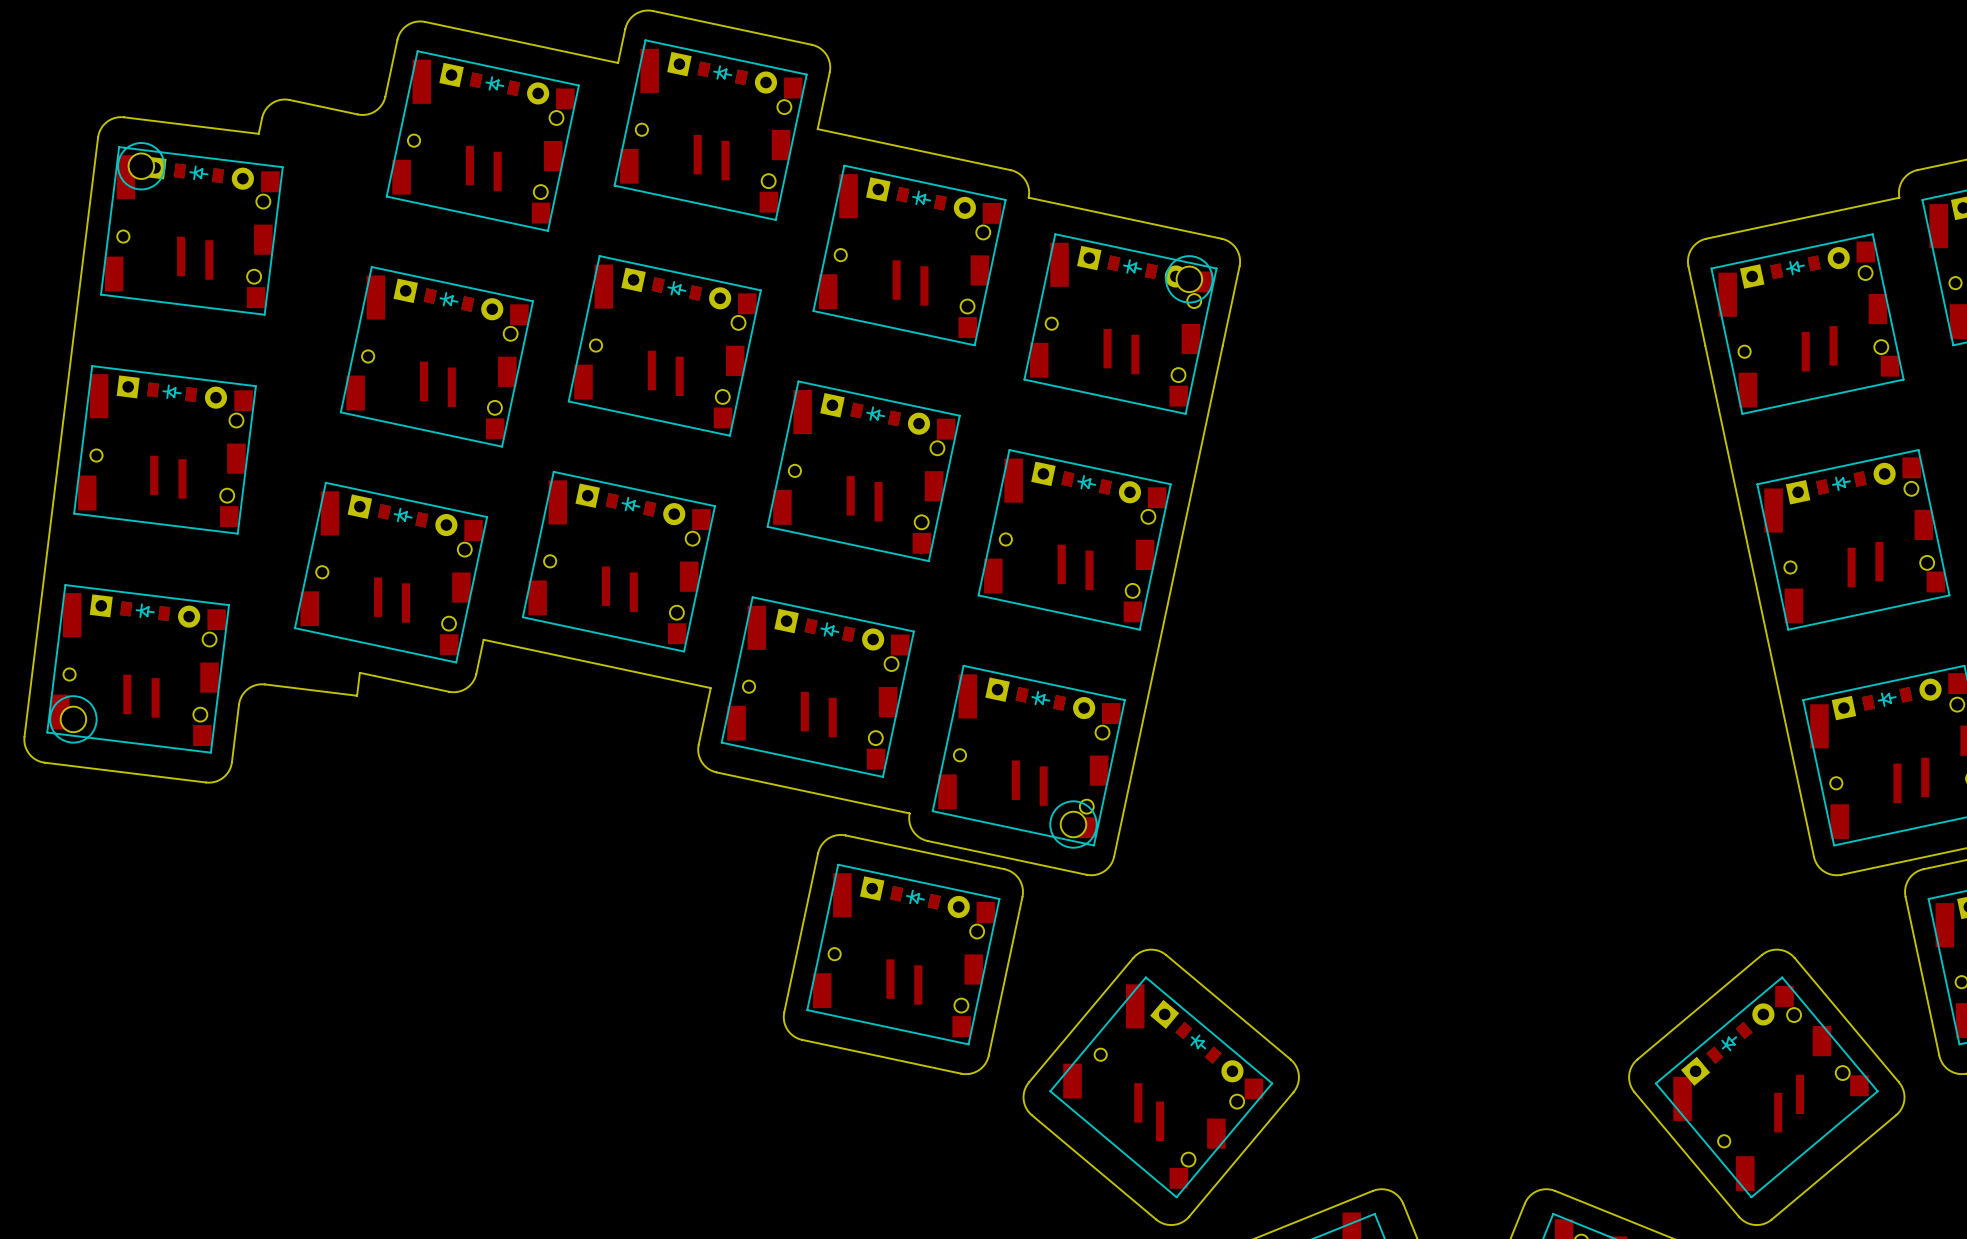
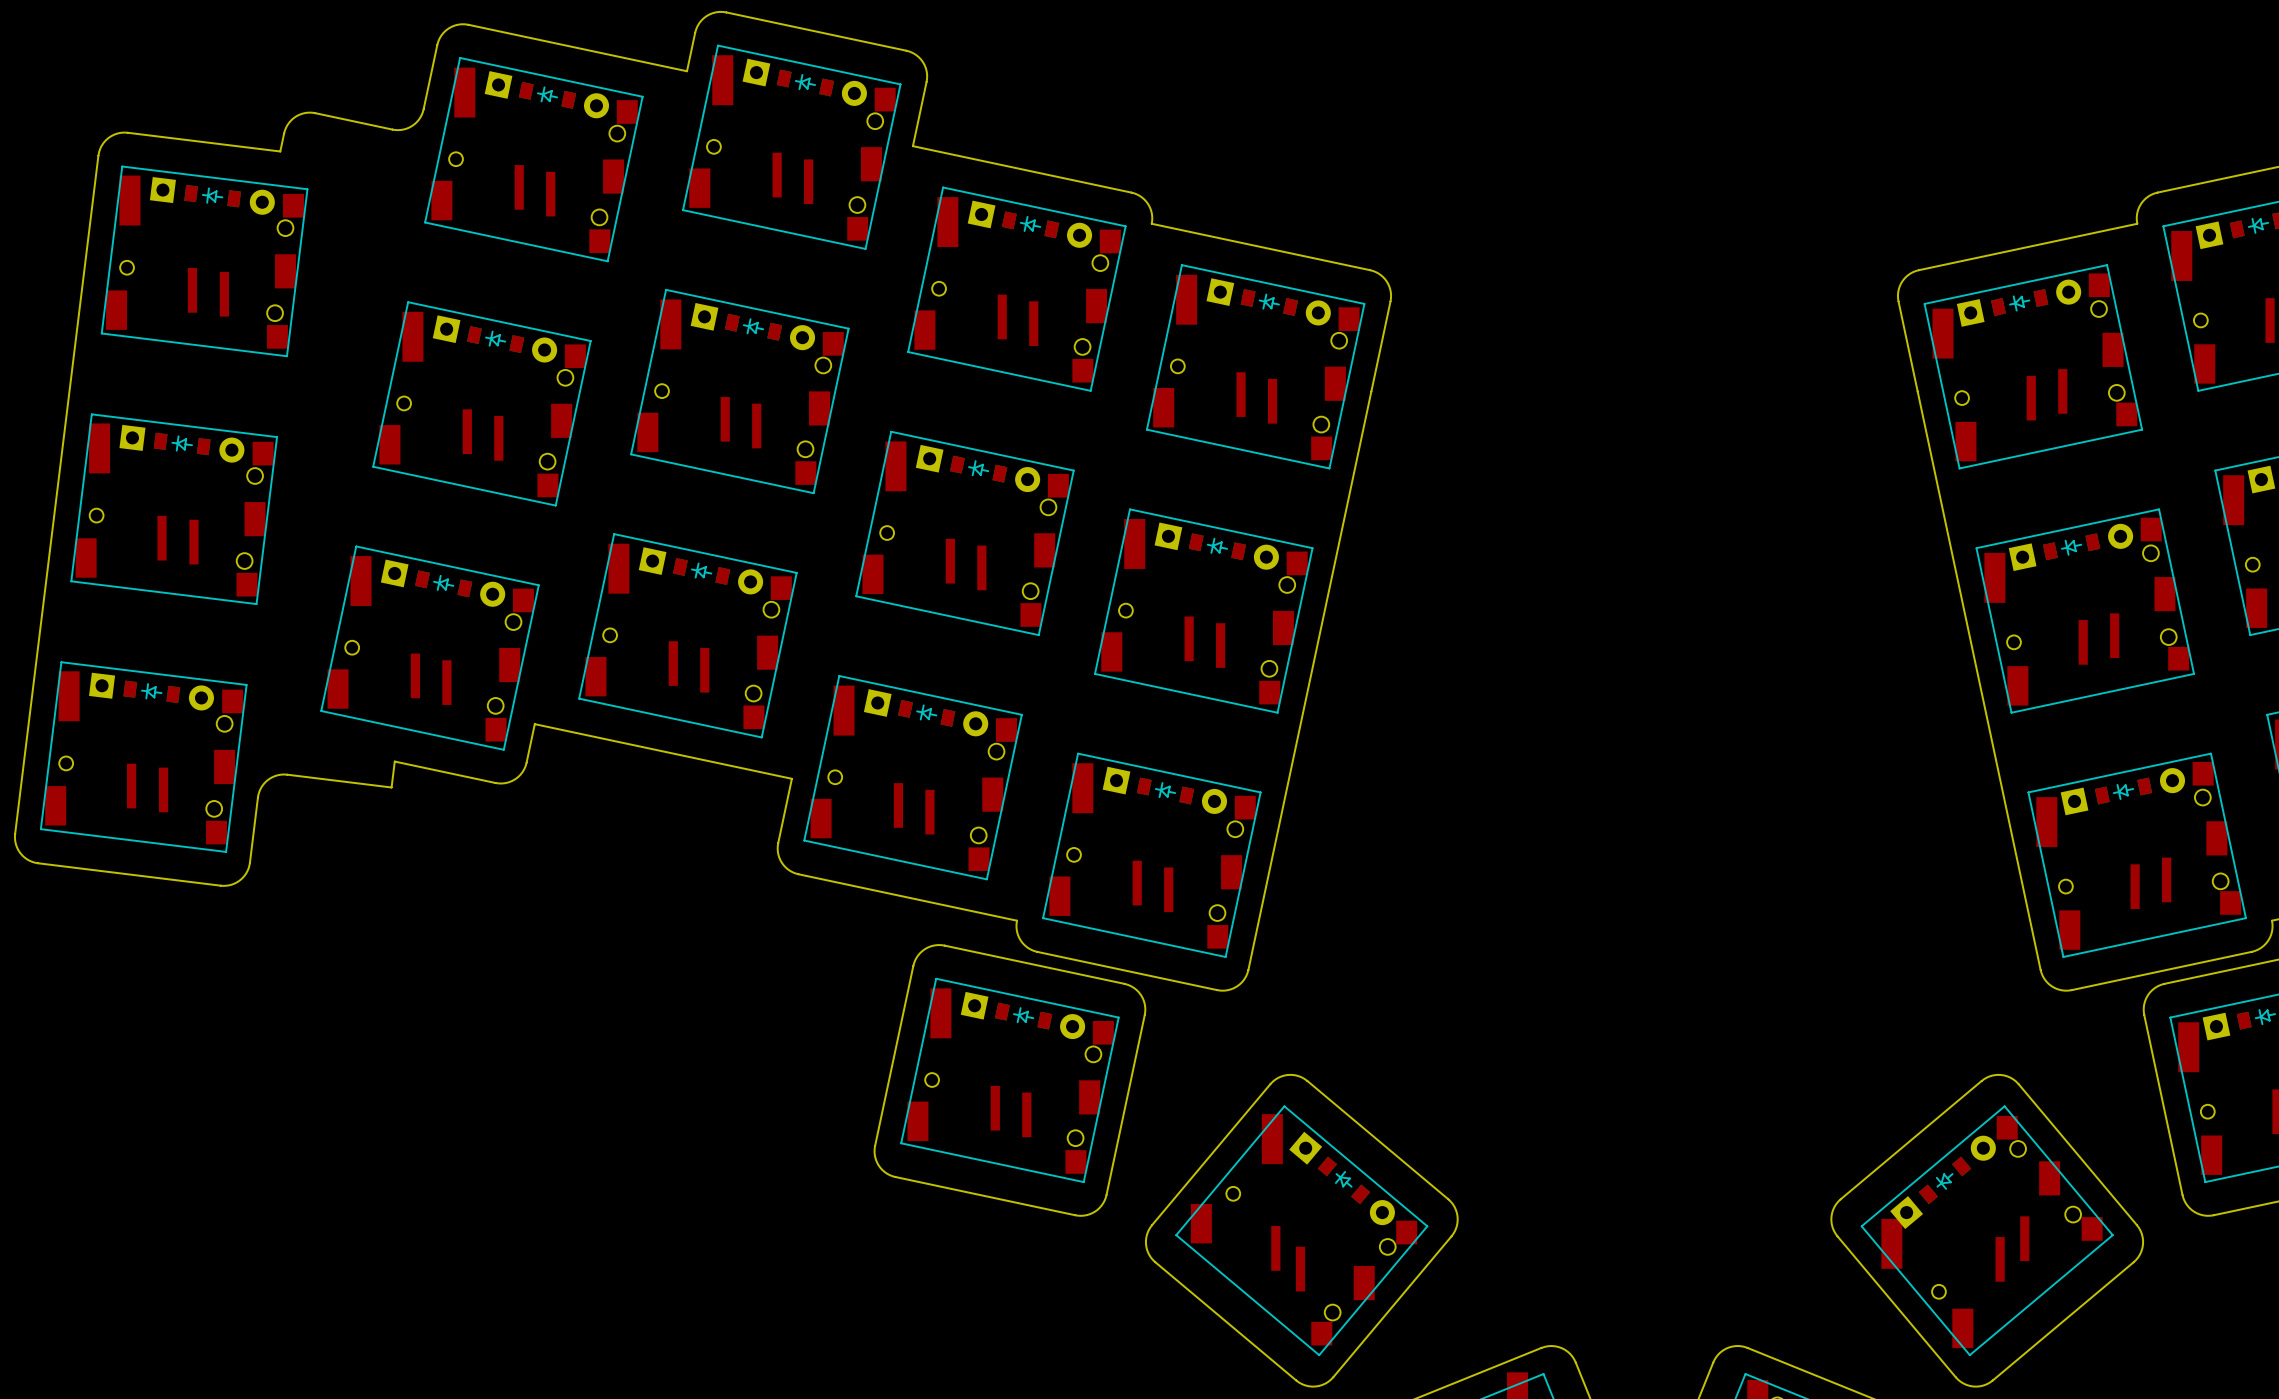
part: (141, 166) -> none
part: (1189, 279) -> none
part: (73, 719) -> none
part: (1073, 824) -> none

